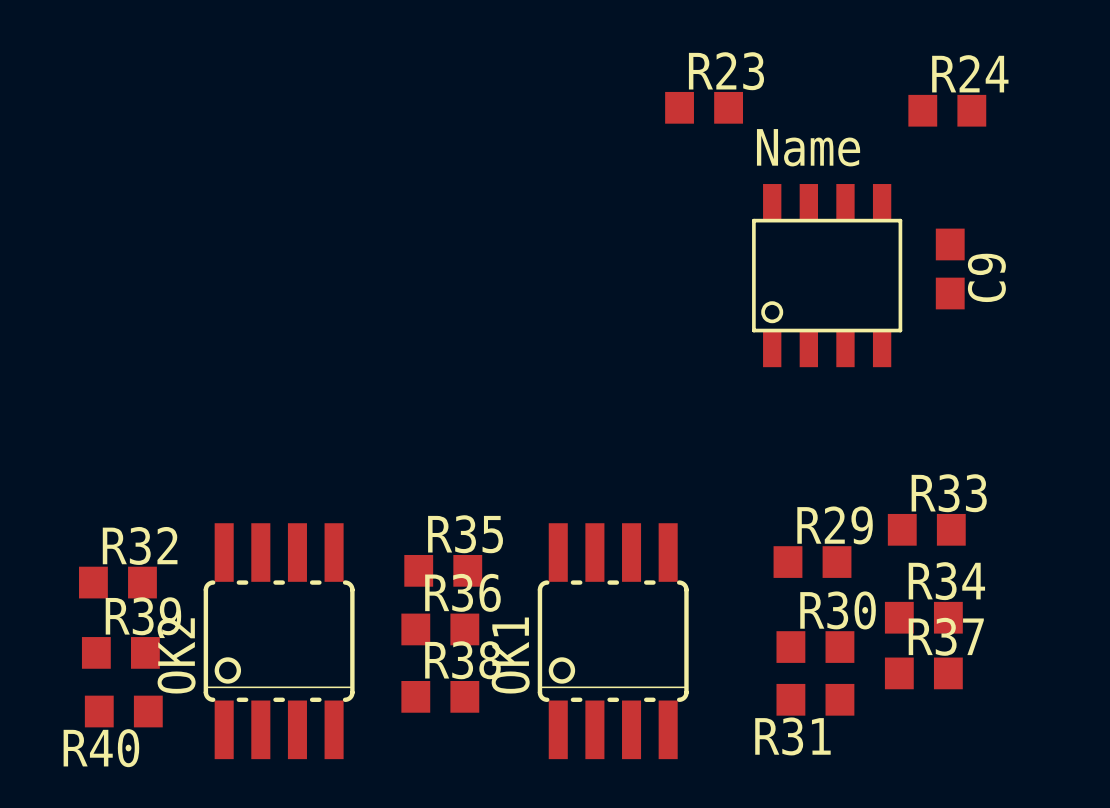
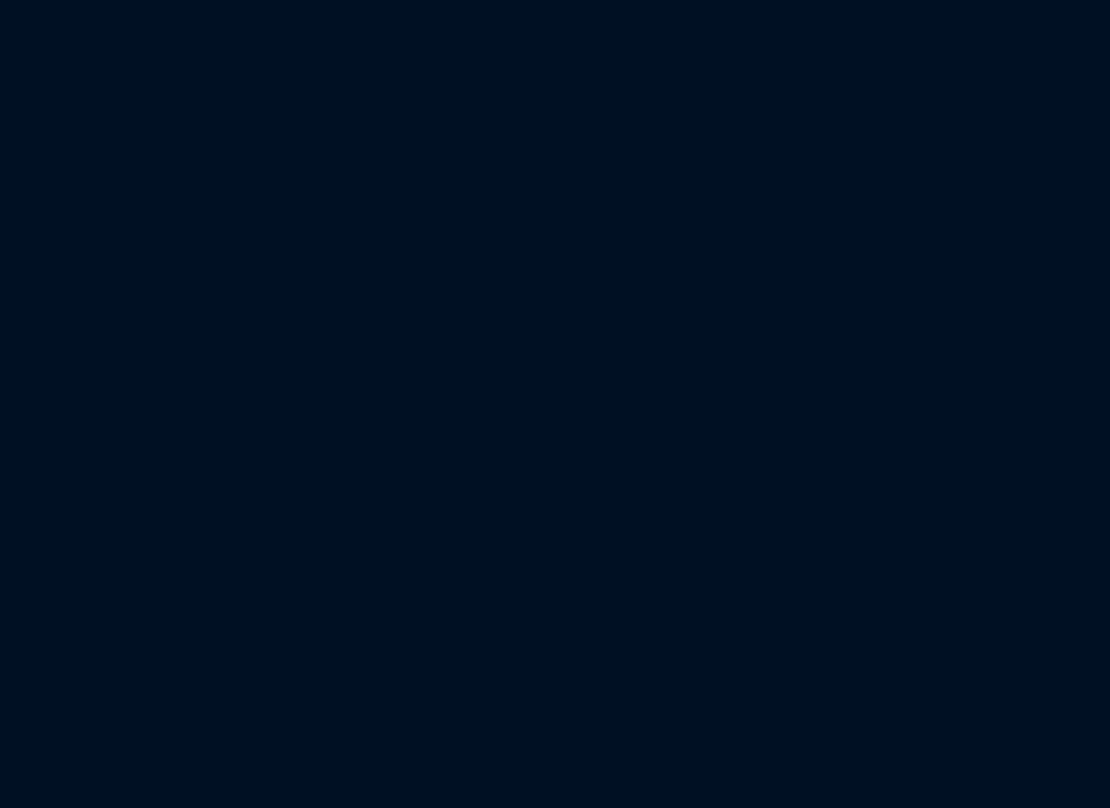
R23: (704, 107) -> none
R24: (947, 110) -> none
C9: (950, 268) -> none
part: (827, 275) -> none
R33: (926, 529) -> none
R29: (812, 562) -> none
R35: (443, 570) -> none
R32: (117, 582) -> none
R34: (923, 617) -> none
R36: (440, 629) -> none
OK2: (279, 641) -> none
OK1: (613, 641) -> none
R30: (815, 647) -> none
R39: (120, 652) -> none
R37: (923, 673) -> none
R38: (440, 696) -> none
R31: (815, 699) -> none
R40: (123, 711) -> none

